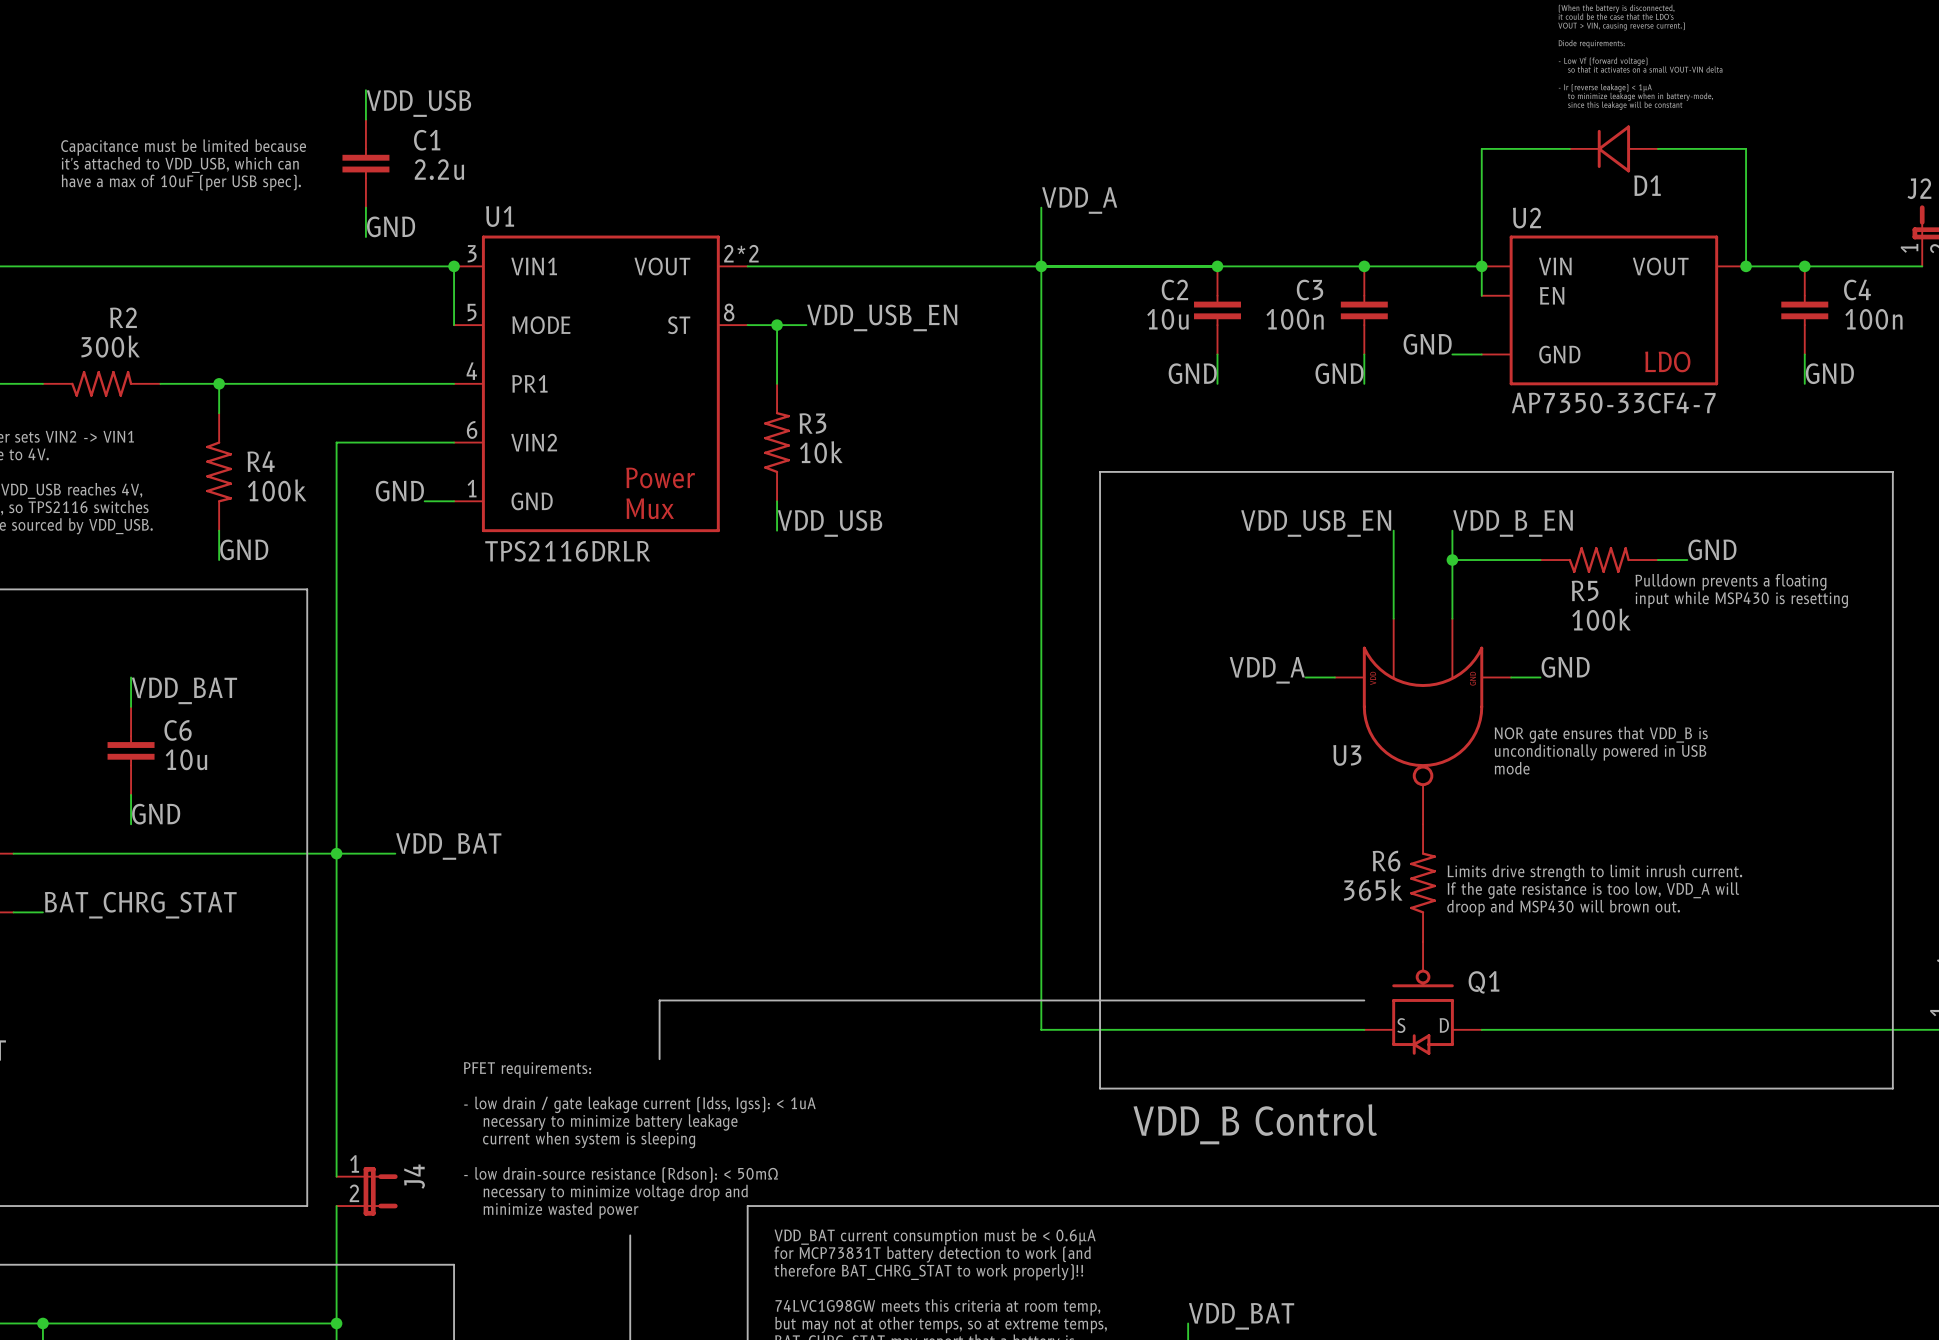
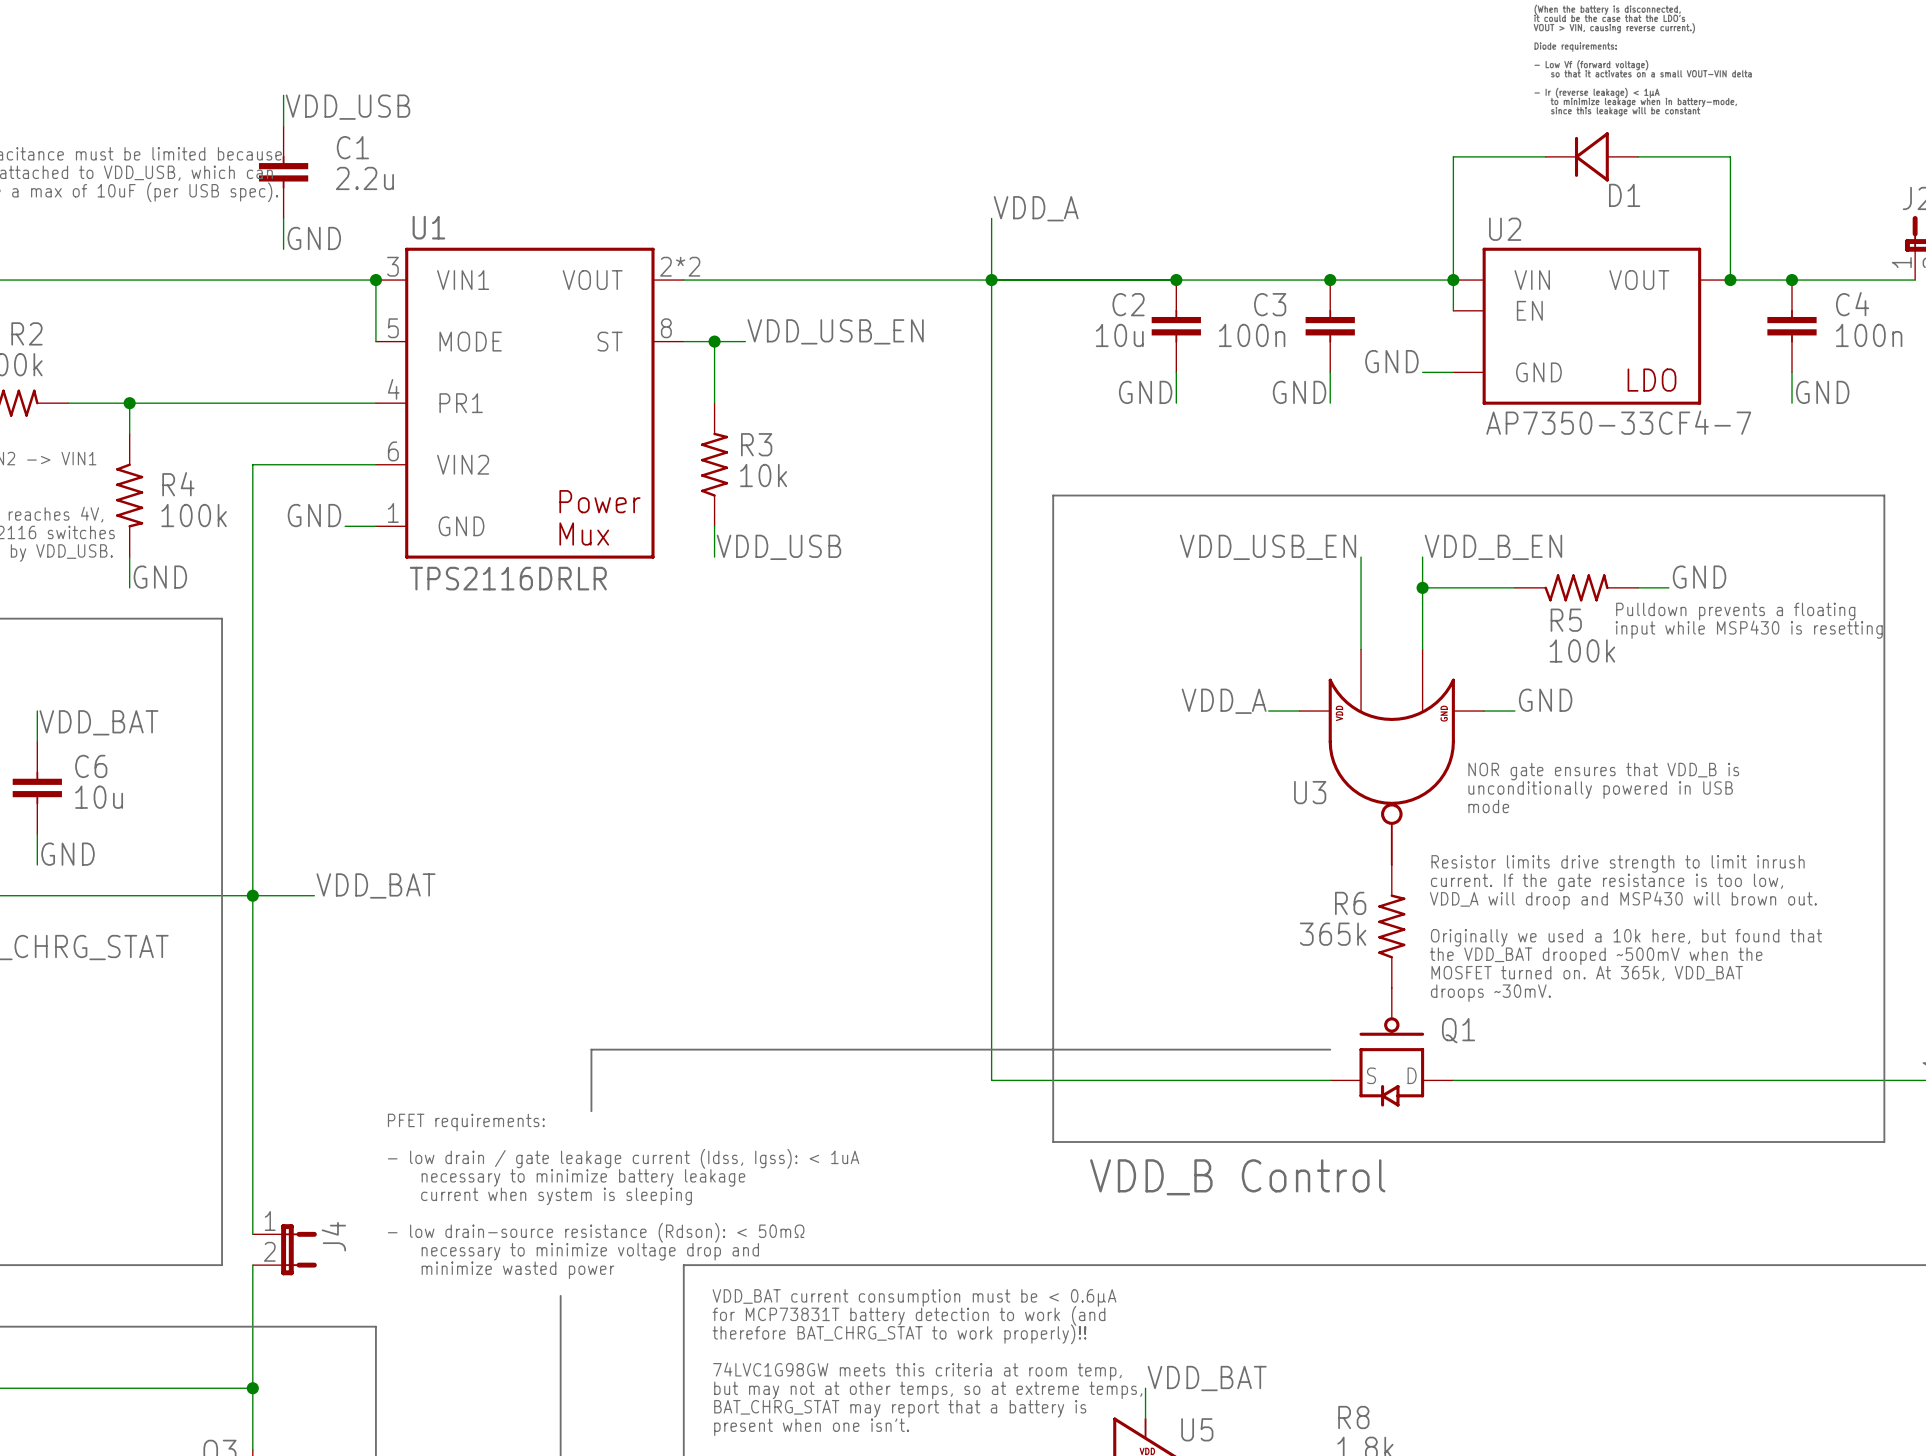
text: none -> Resistor limits drive strength to limit inrush (1618, 863)
text: none -> current. If the gate resistance is too low, (1606, 882)
text: none -> VDD_A will droop and MSP430 will brown out. (1623, 900)
text: Limits drive strength to limit inrush current. (1594, 872) -> none
text: If the gate resistance is too low, VDD_A will (1593, 890) -> none
text: none -> Originally we used a 10k here, but found that (1626, 937)
text: droop and MSP430 will brown out. (1563, 908) -> none
text: none -> the VDD_BAT drooped ~500mV when the (1596, 956)
text: none -> MOSFET turned on. At 365k, VDD_BAT (1587, 973)
text: none -> droops ~30mV. (1490, 993)

